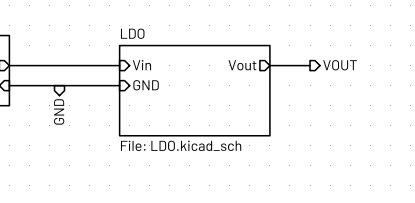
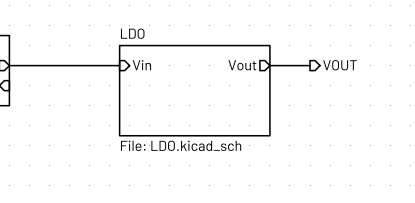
wire: (9, 85) (119, 85) -> none
sheet pin: GND (146, 85) -> none
hierarchical label: GND (59, 111) -> none

